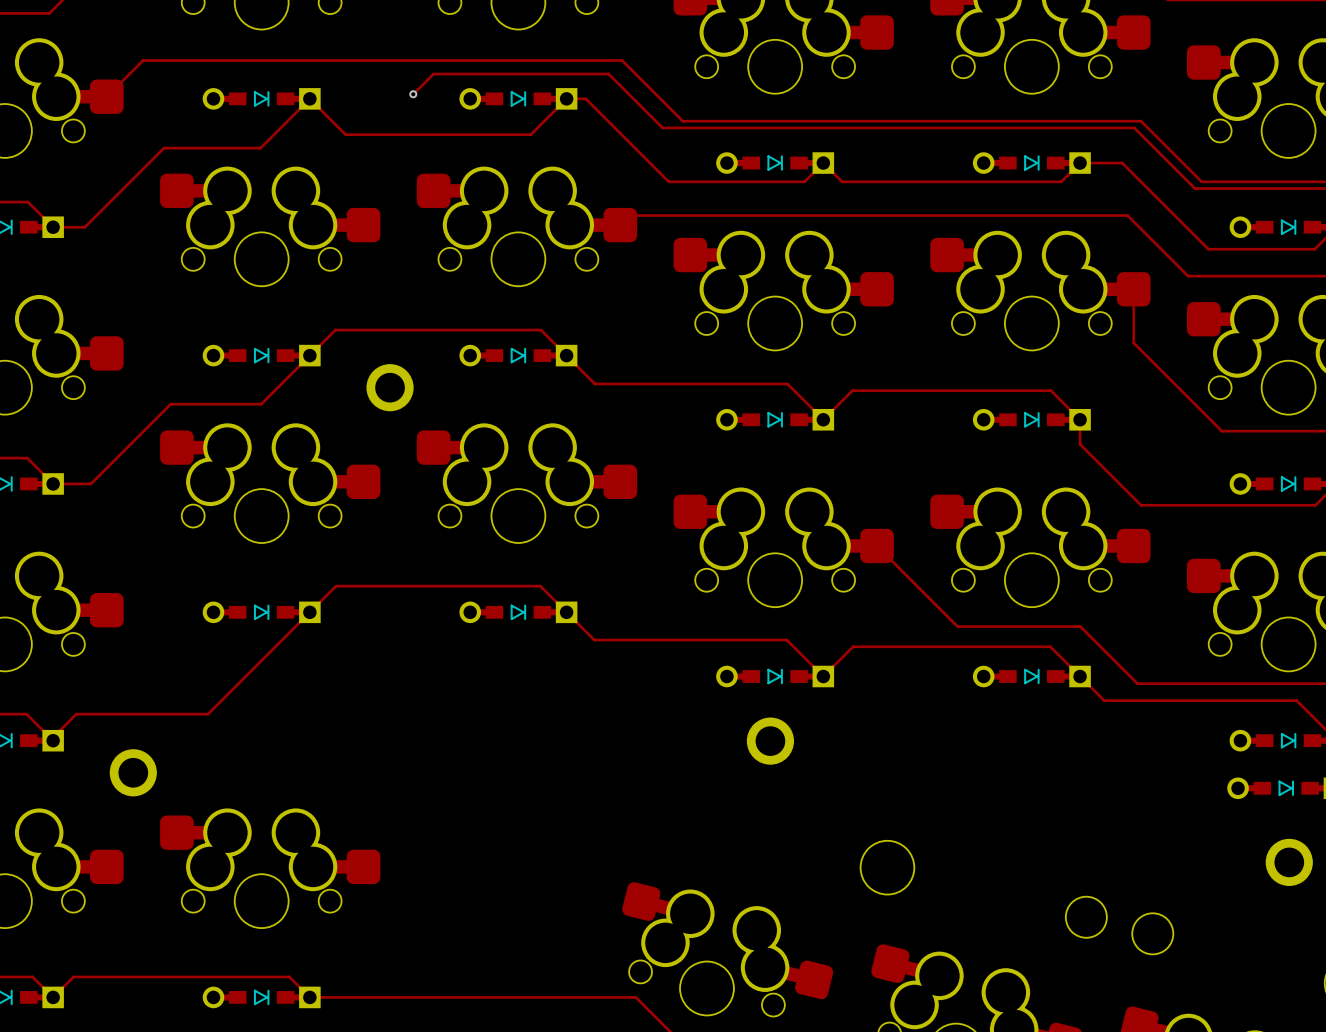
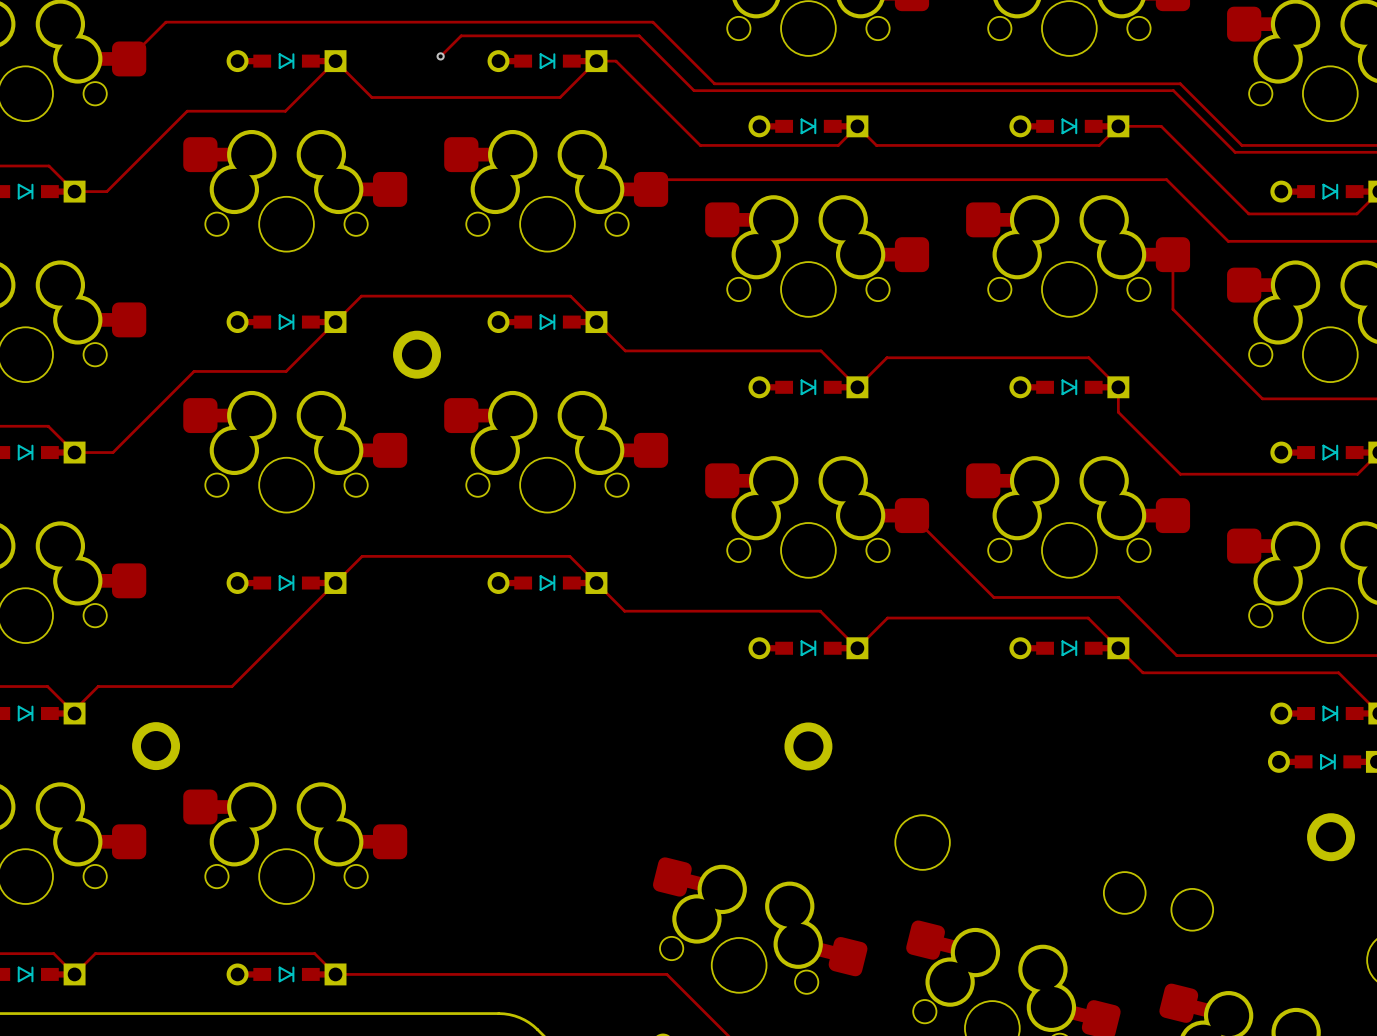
part position: (770, 741) -> (808, 746)

